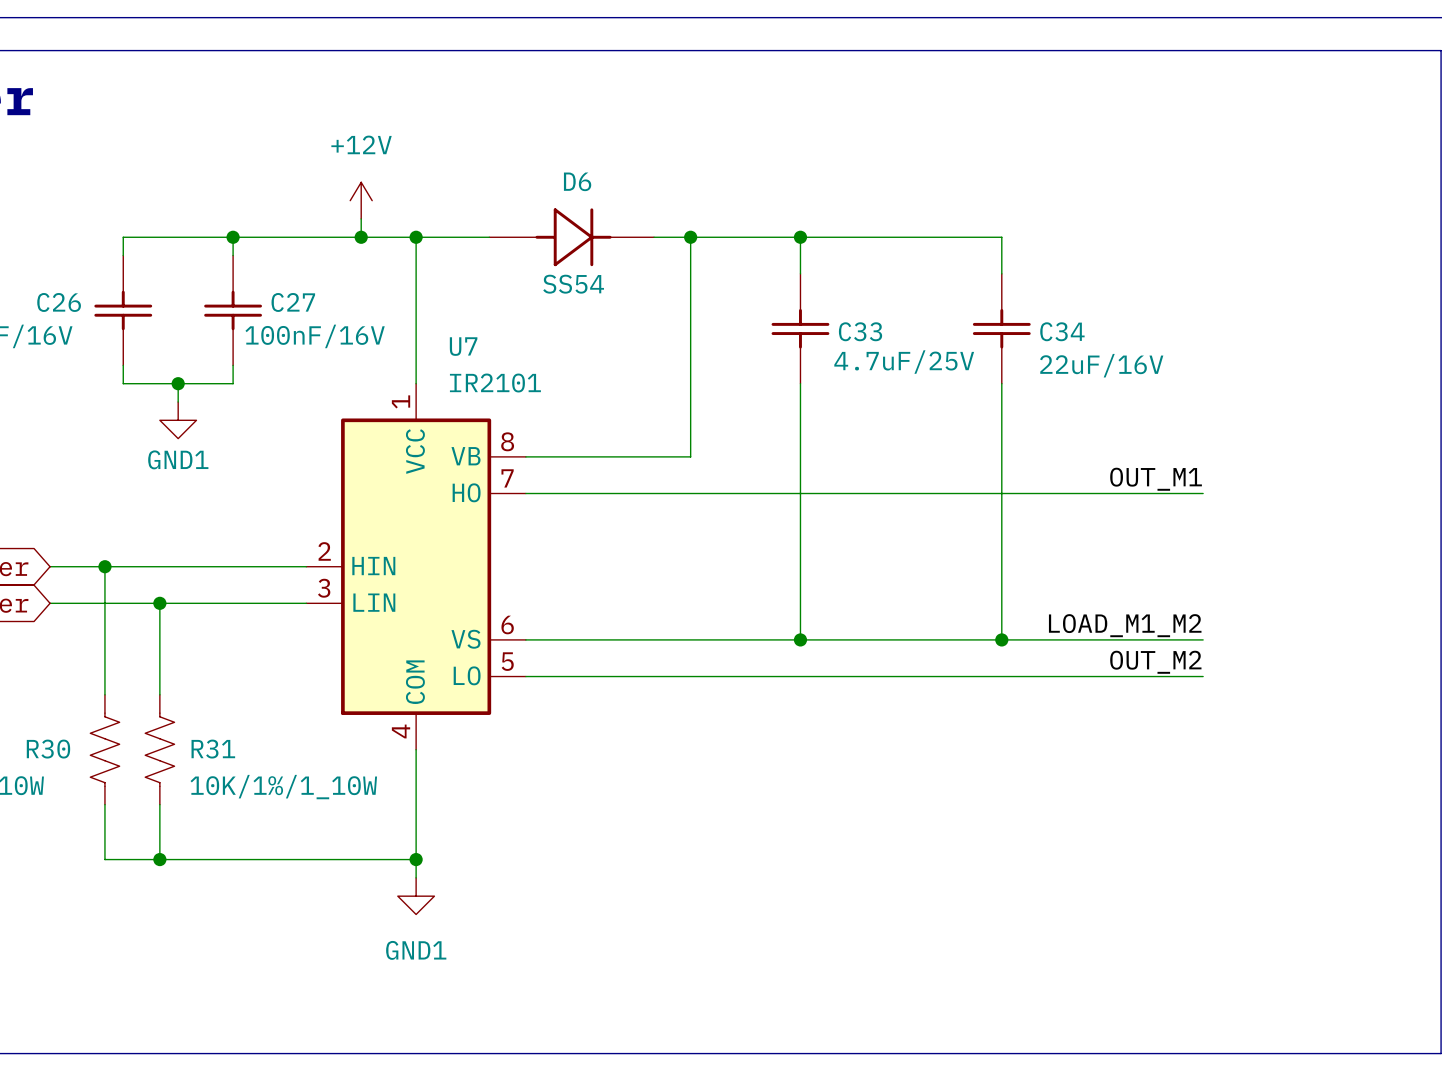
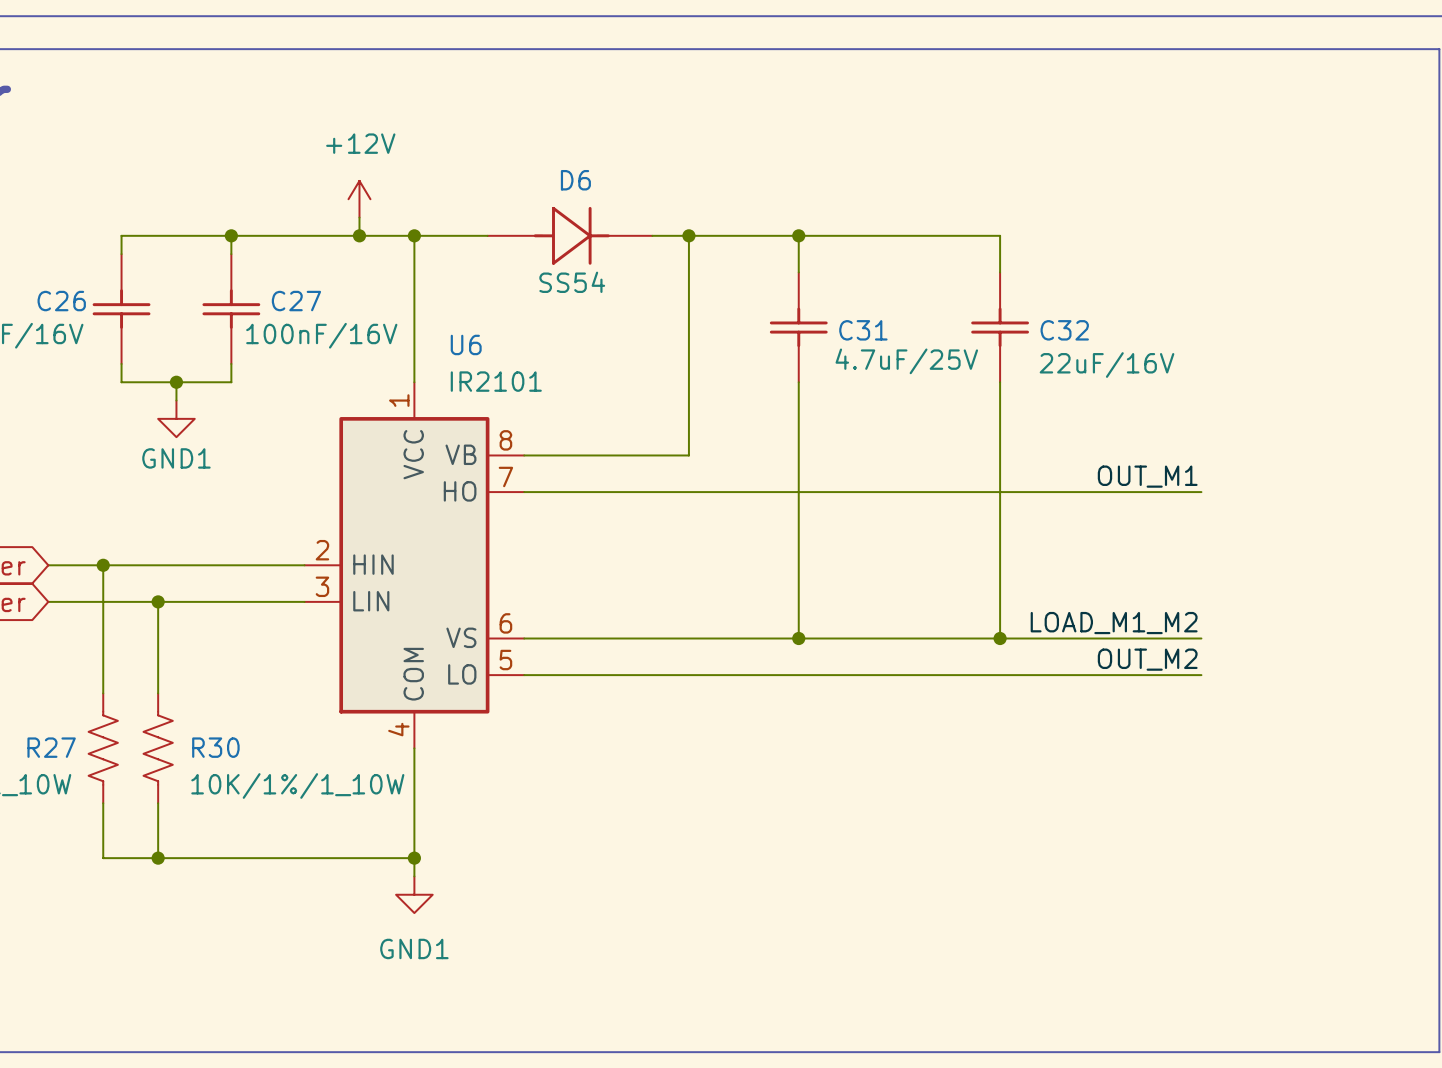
C33 name: C33 (860, 331) -> C31 (863, 330)
C34 name: C34 (1062, 331) -> C32 (1064, 330)
U7 name: U7 (463, 346) -> U6 (466, 344)
R30 name: R30 (48, 749) -> R27 (51, 747)
R31 name: R31 (213, 749) -> R30 (215, 747)

